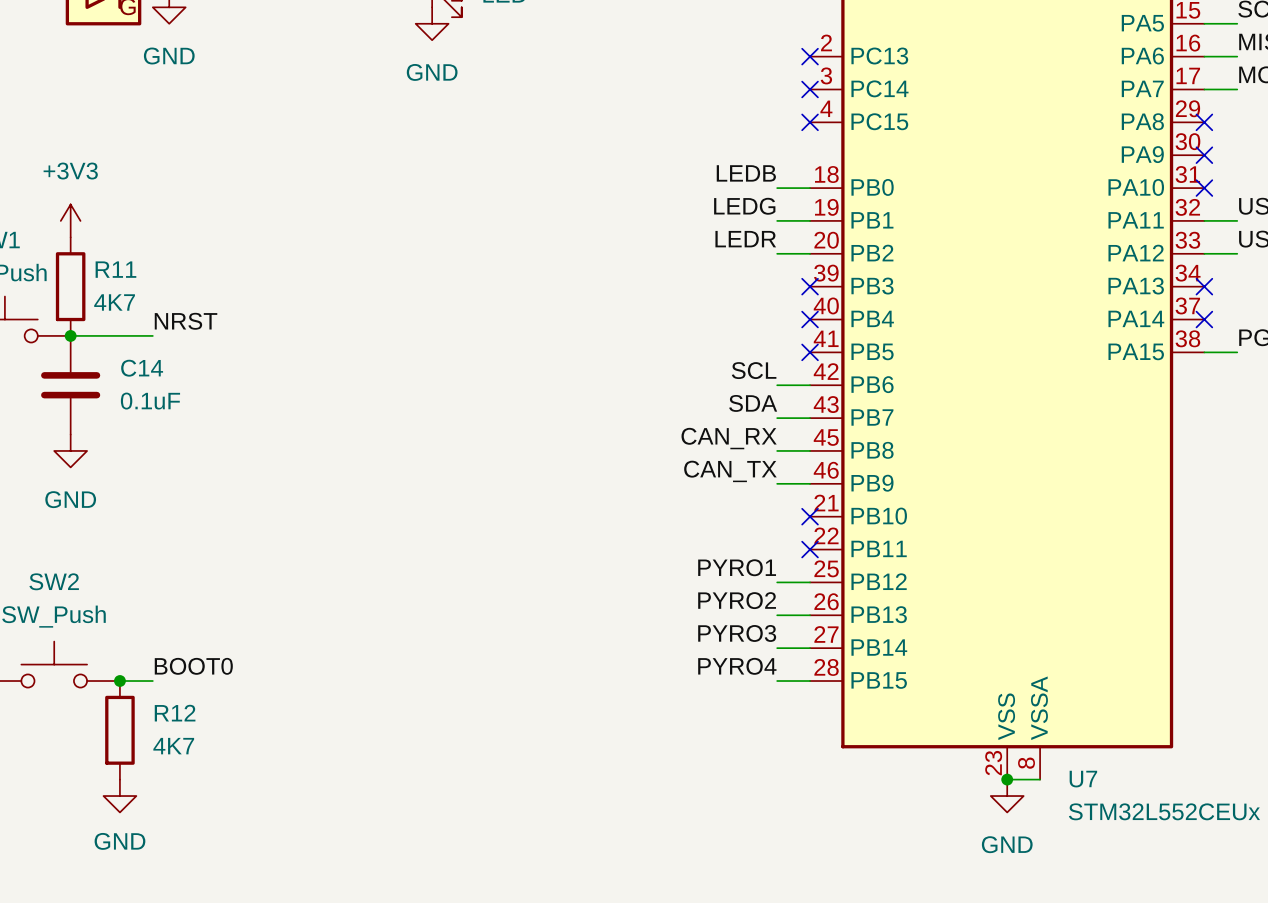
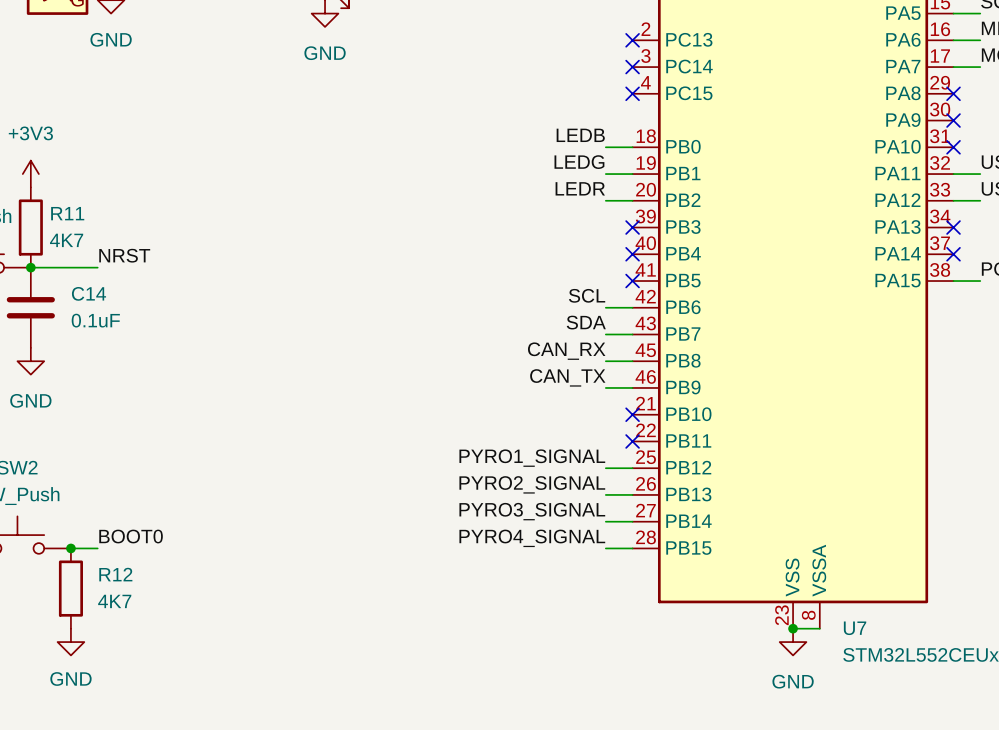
label: PYRO1 (737, 567) -> PYRO1_SIGNAL (532, 458)
label: PYRO2 (737, 600) -> PYRO2_SIGNAL (532, 484)
label: PYRO3 (737, 633) -> PYRO3_SIGNAL (532, 511)
label: PYRO4 (737, 666) -> PYRO4_SIGNAL (532, 538)

